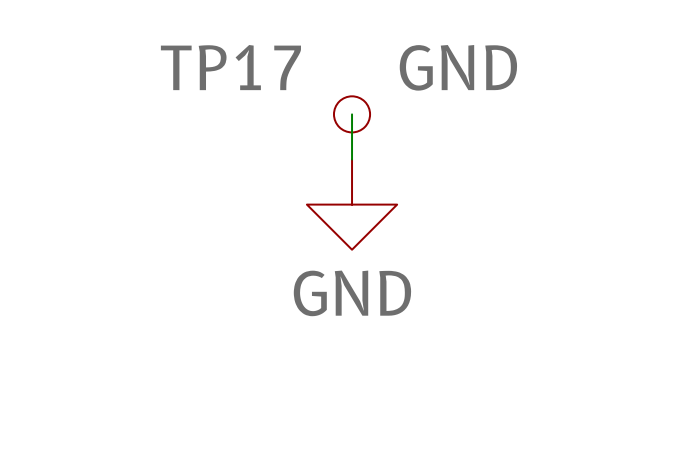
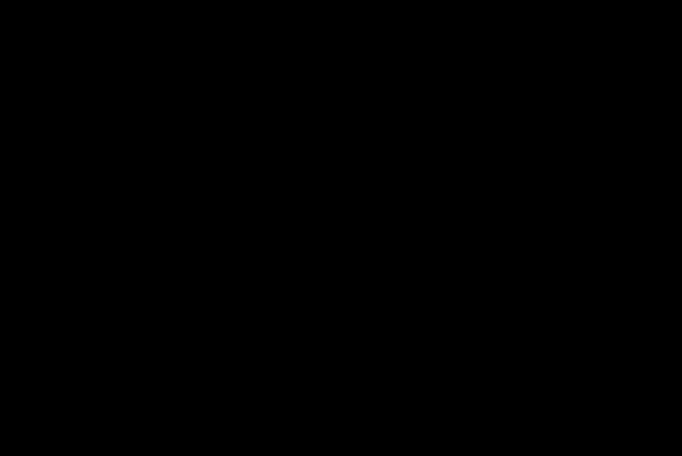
wire: (352, 114) (352, 159) -> none
TP17: GND (352, 114) -> none
power symbol: GND (352, 204) -> none

